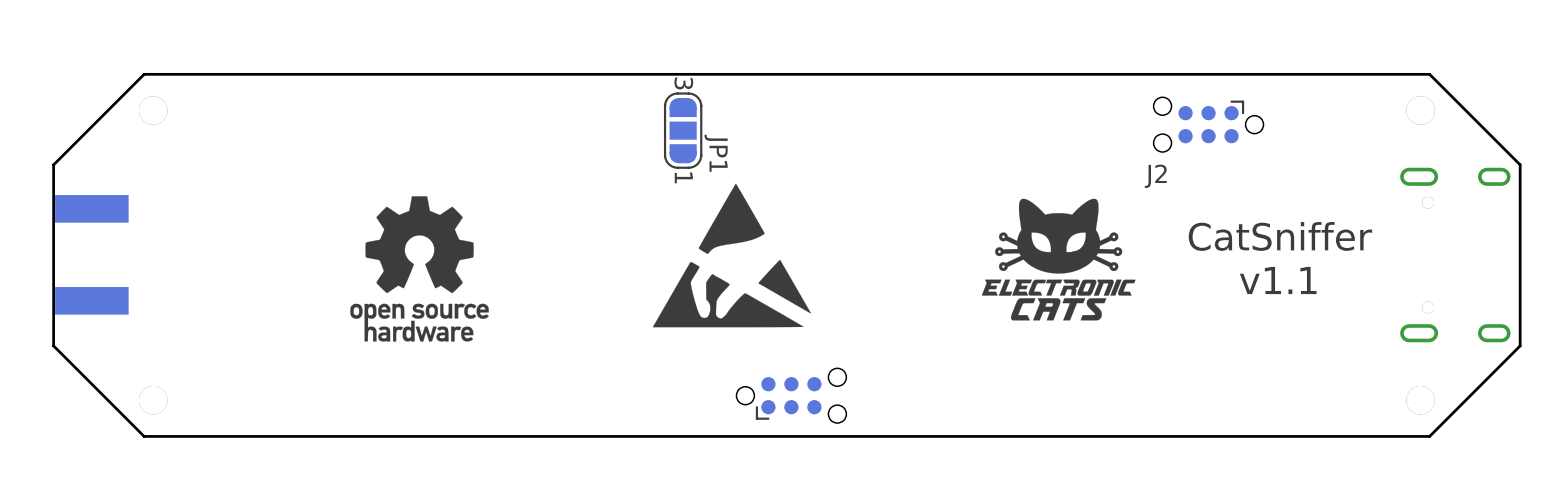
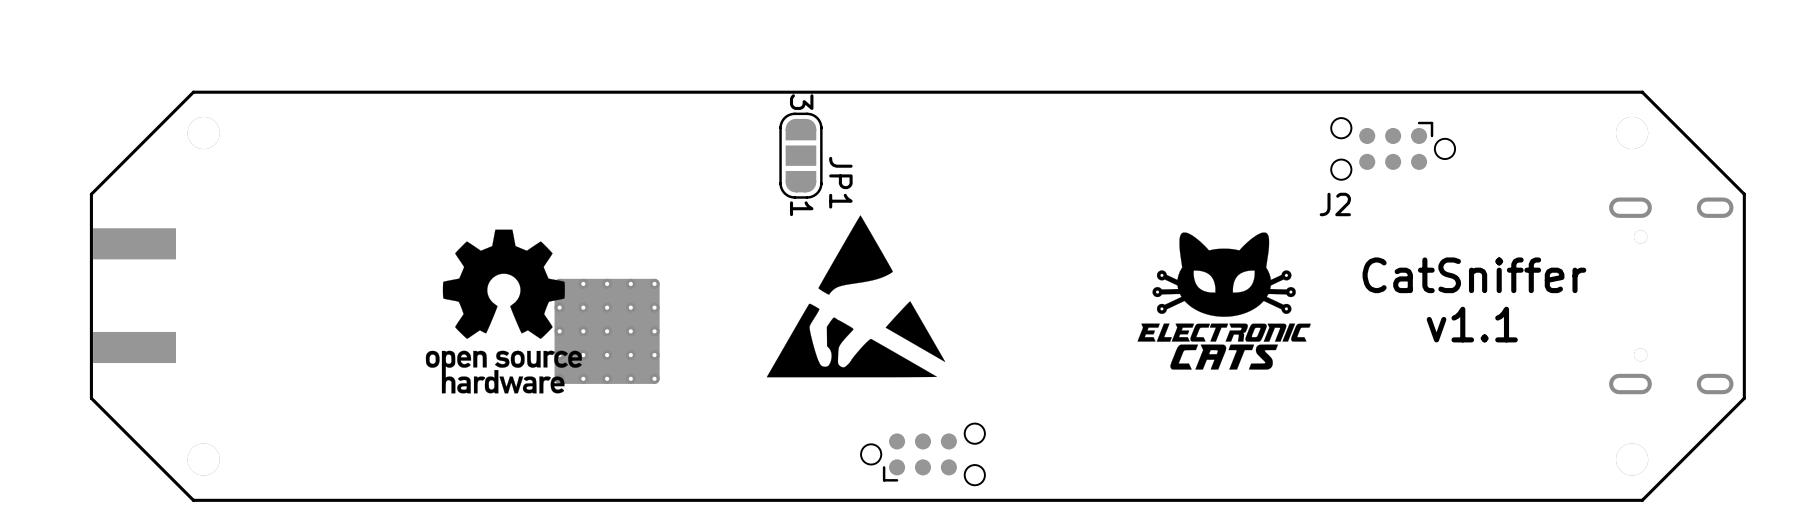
part: none -> (607, 331)

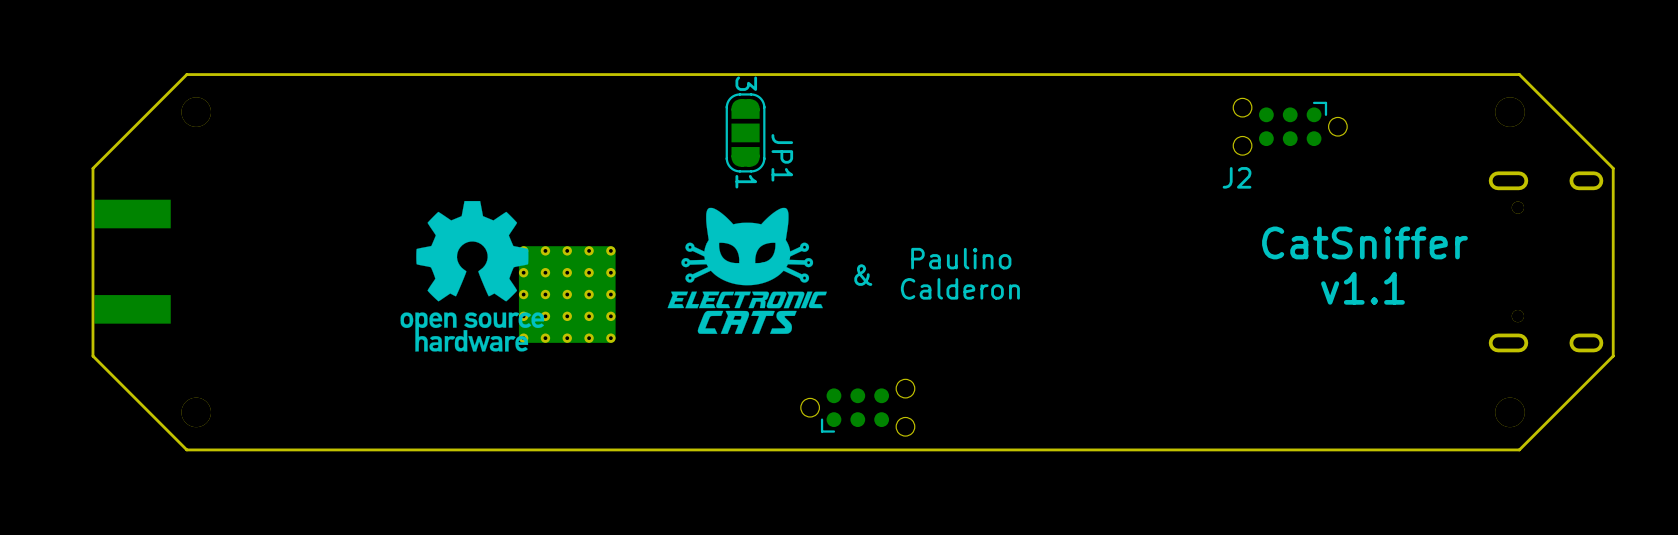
drawing: [766, 215, 946, 378] -> none
text: none -> Paulino (961, 258)
drawing position: (1224, 301) -> (747, 270)
text: none -> & (863, 275)
text: none -> Calderon (960, 288)

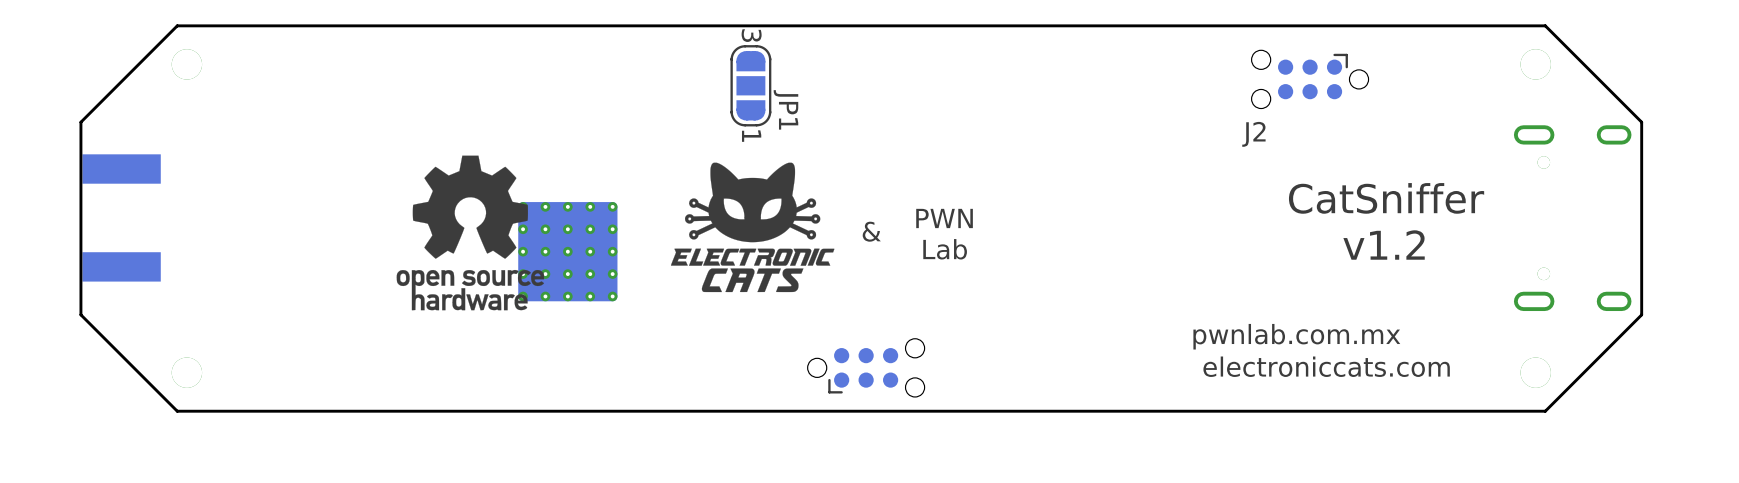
text: Paulino (961, 258) -> none
text: none -> PWN (944, 218)
text: Calderon (960, 288) -> none
text: v1.1 (1362, 288) -> v1.2 (1384, 245)
text: none -> Lab (945, 249)
text: none -> pwnlab.com.mx (1296, 336)
text: none -> electroniccats.com (1326, 366)

